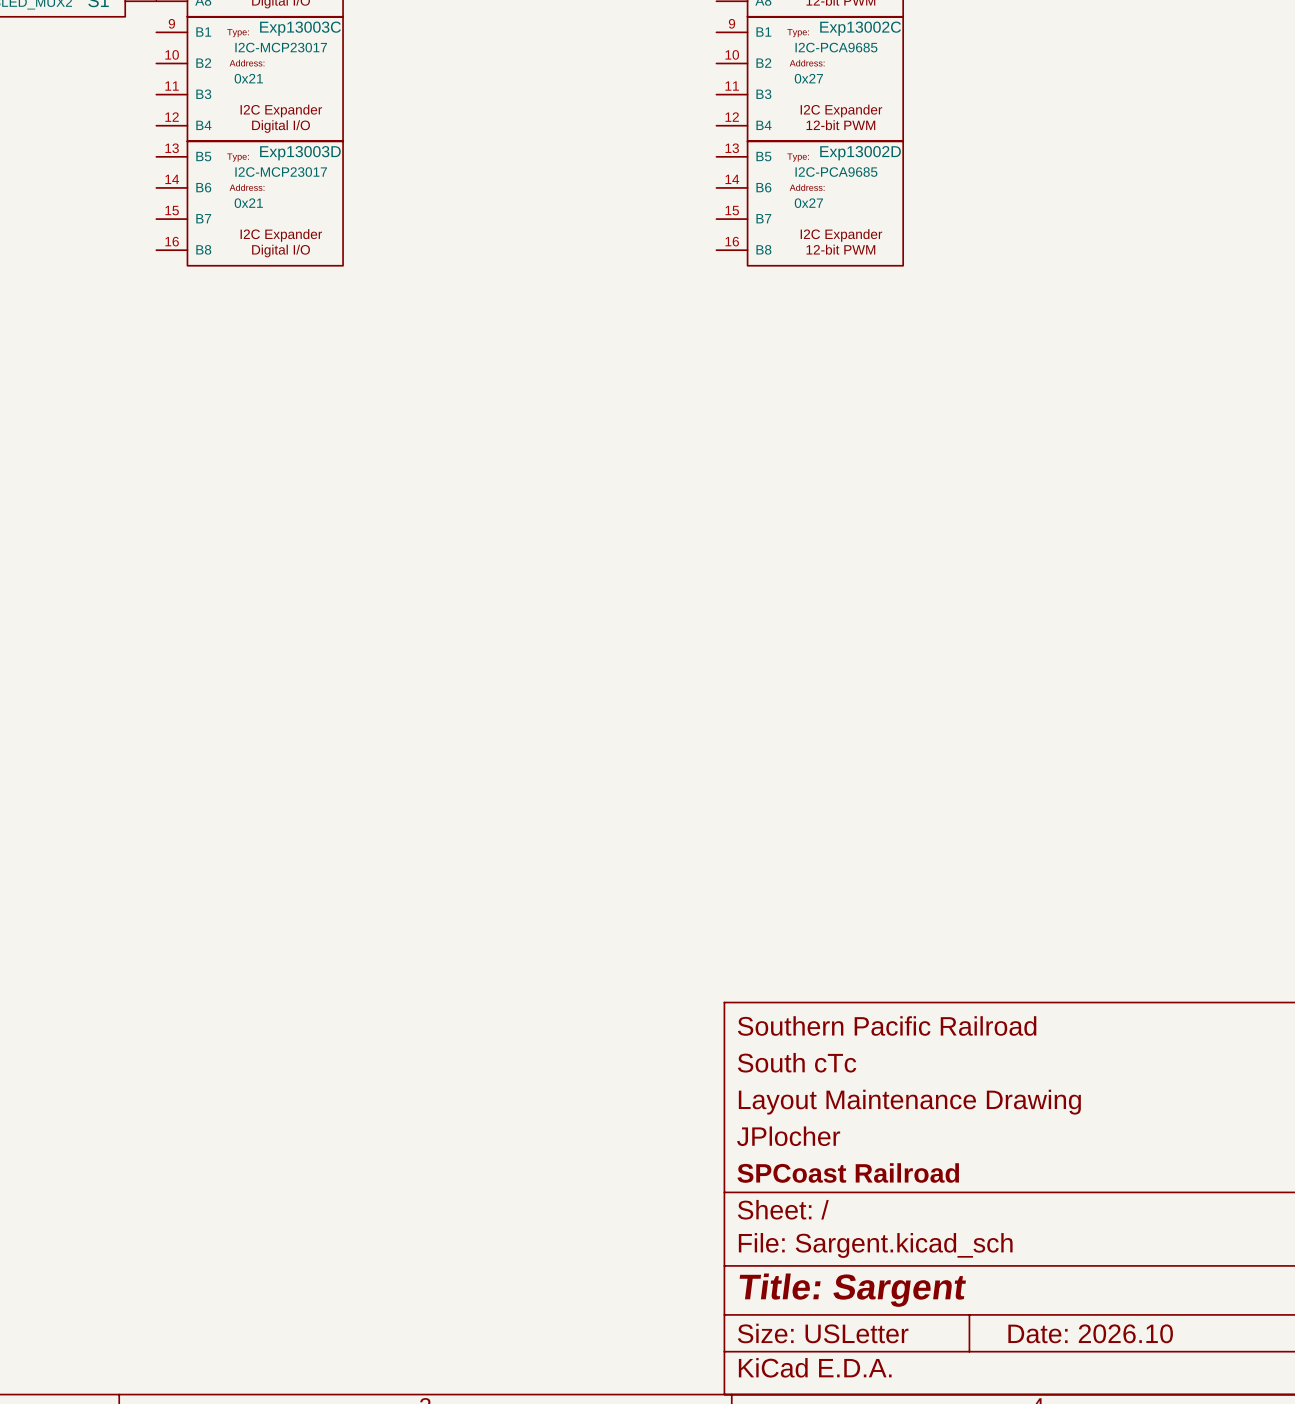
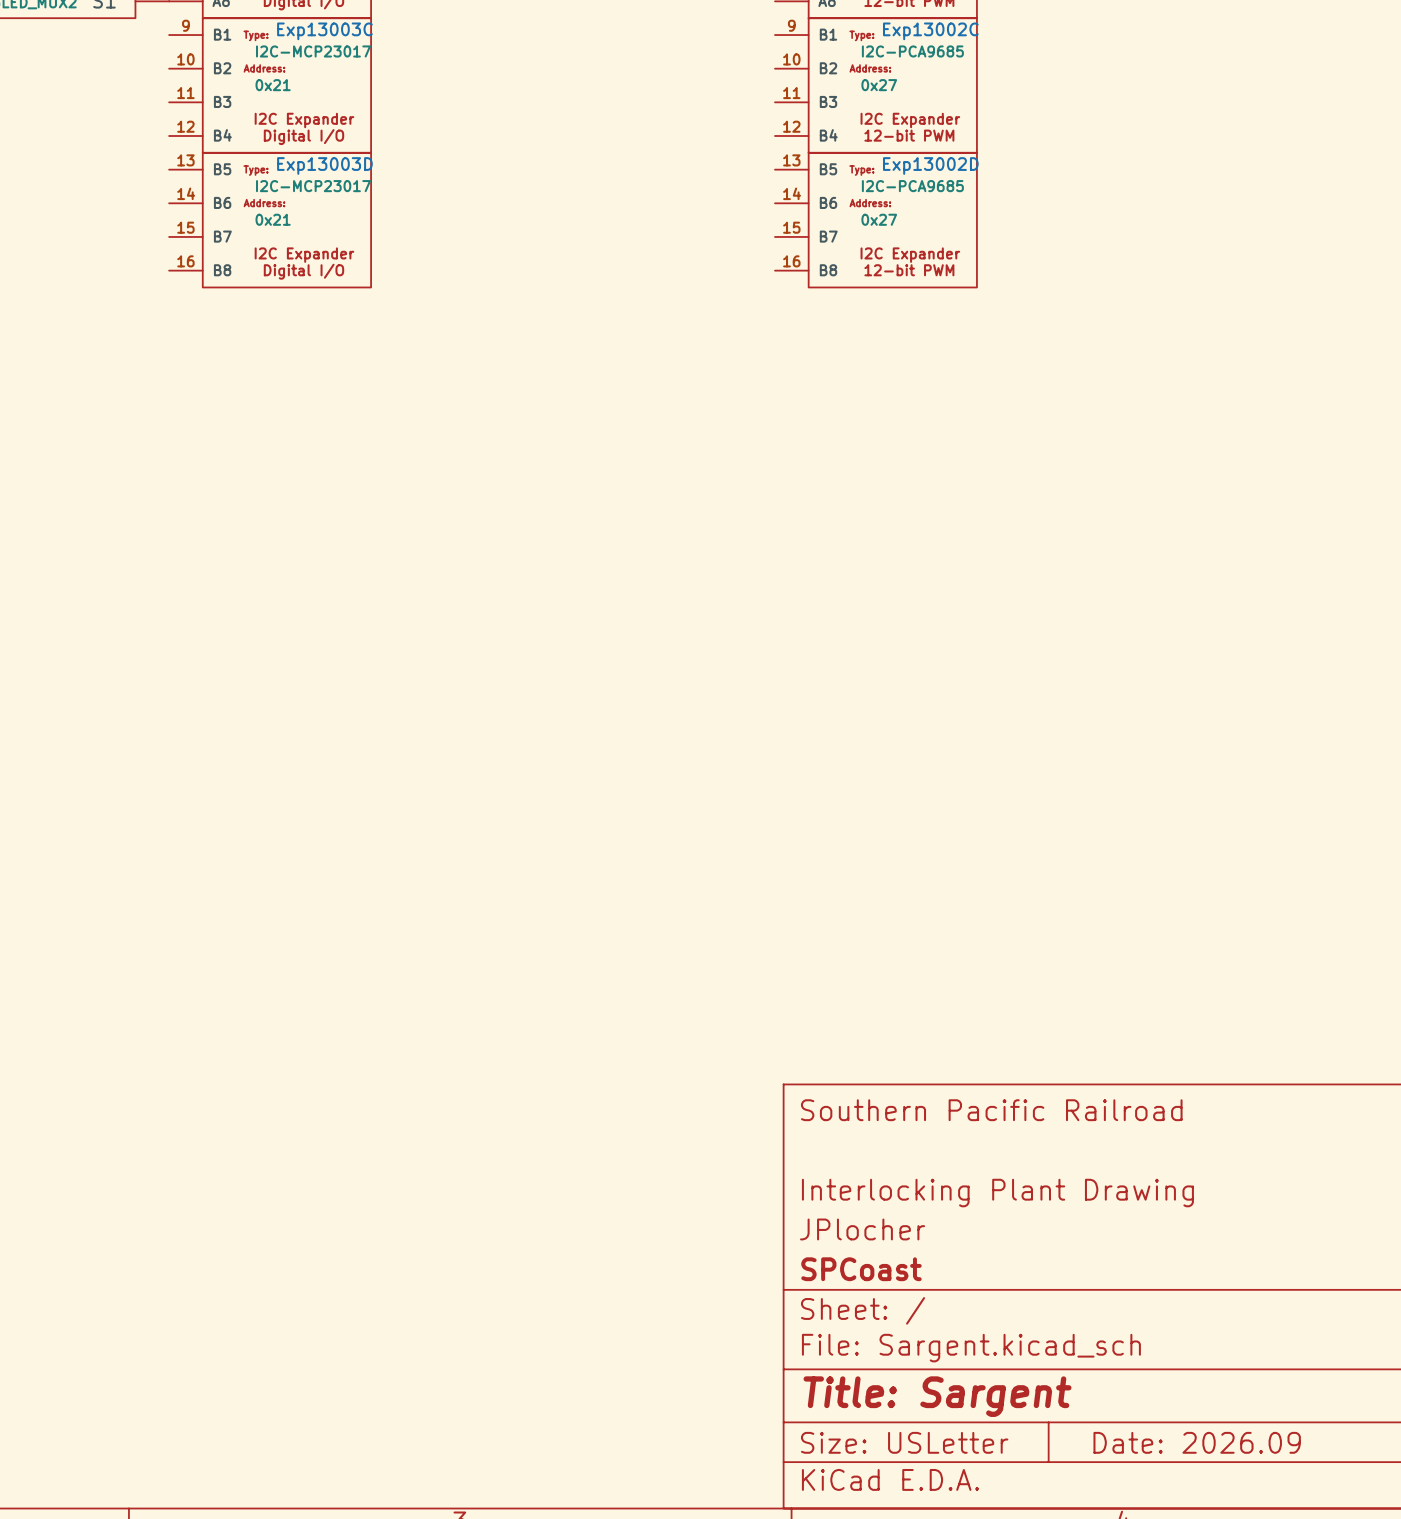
title block: South cTc (797, 1062) -> none
title block: Layout Maintenance Drawing (909, 1102) -> Interlocking Plant Drawing (997, 1193)
title block: SPCoast Railroad (848, 1172) -> SPCoast (861, 1269)
title block: Date: 2026.10 (1090, 1333) -> Date: 2026.09 (1197, 1442)

